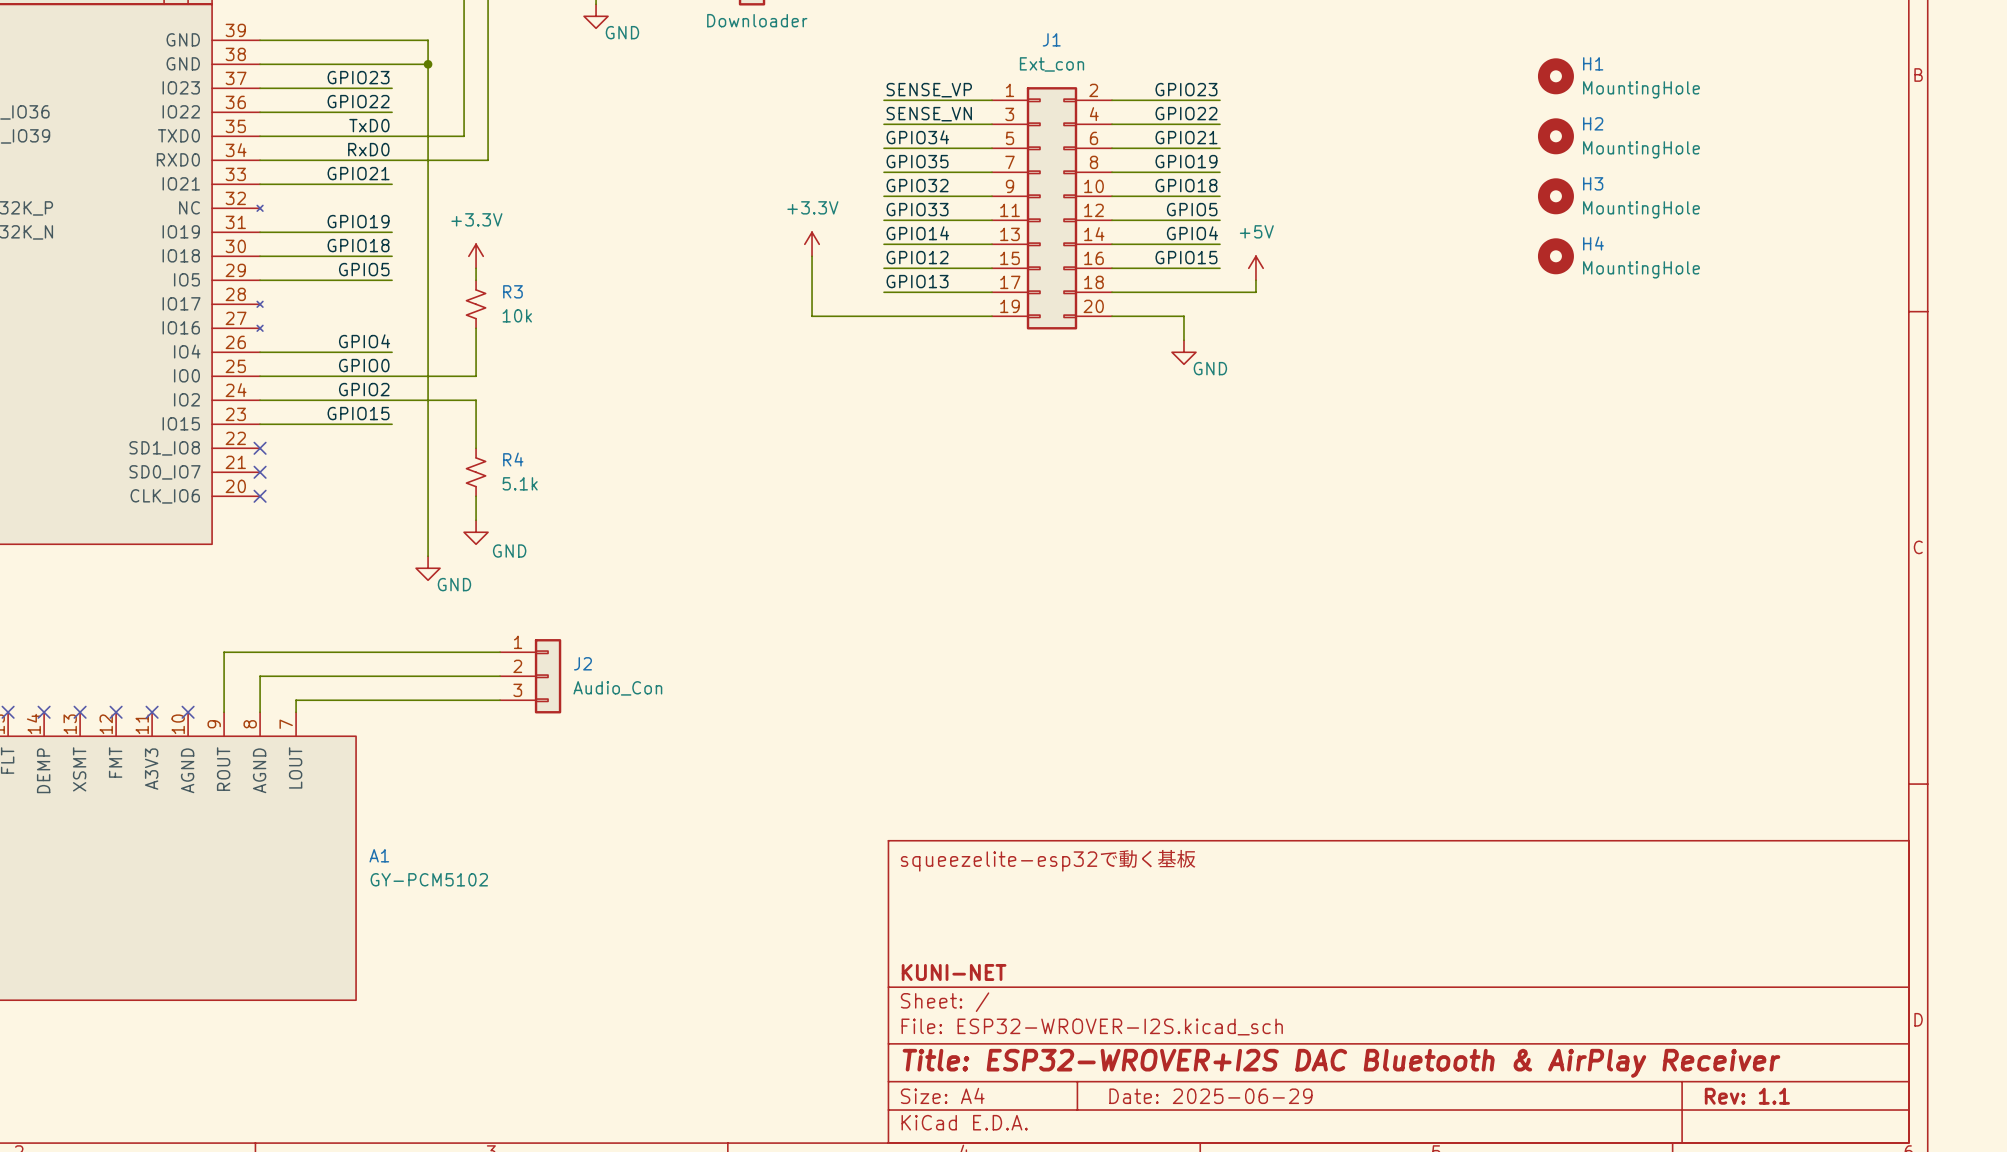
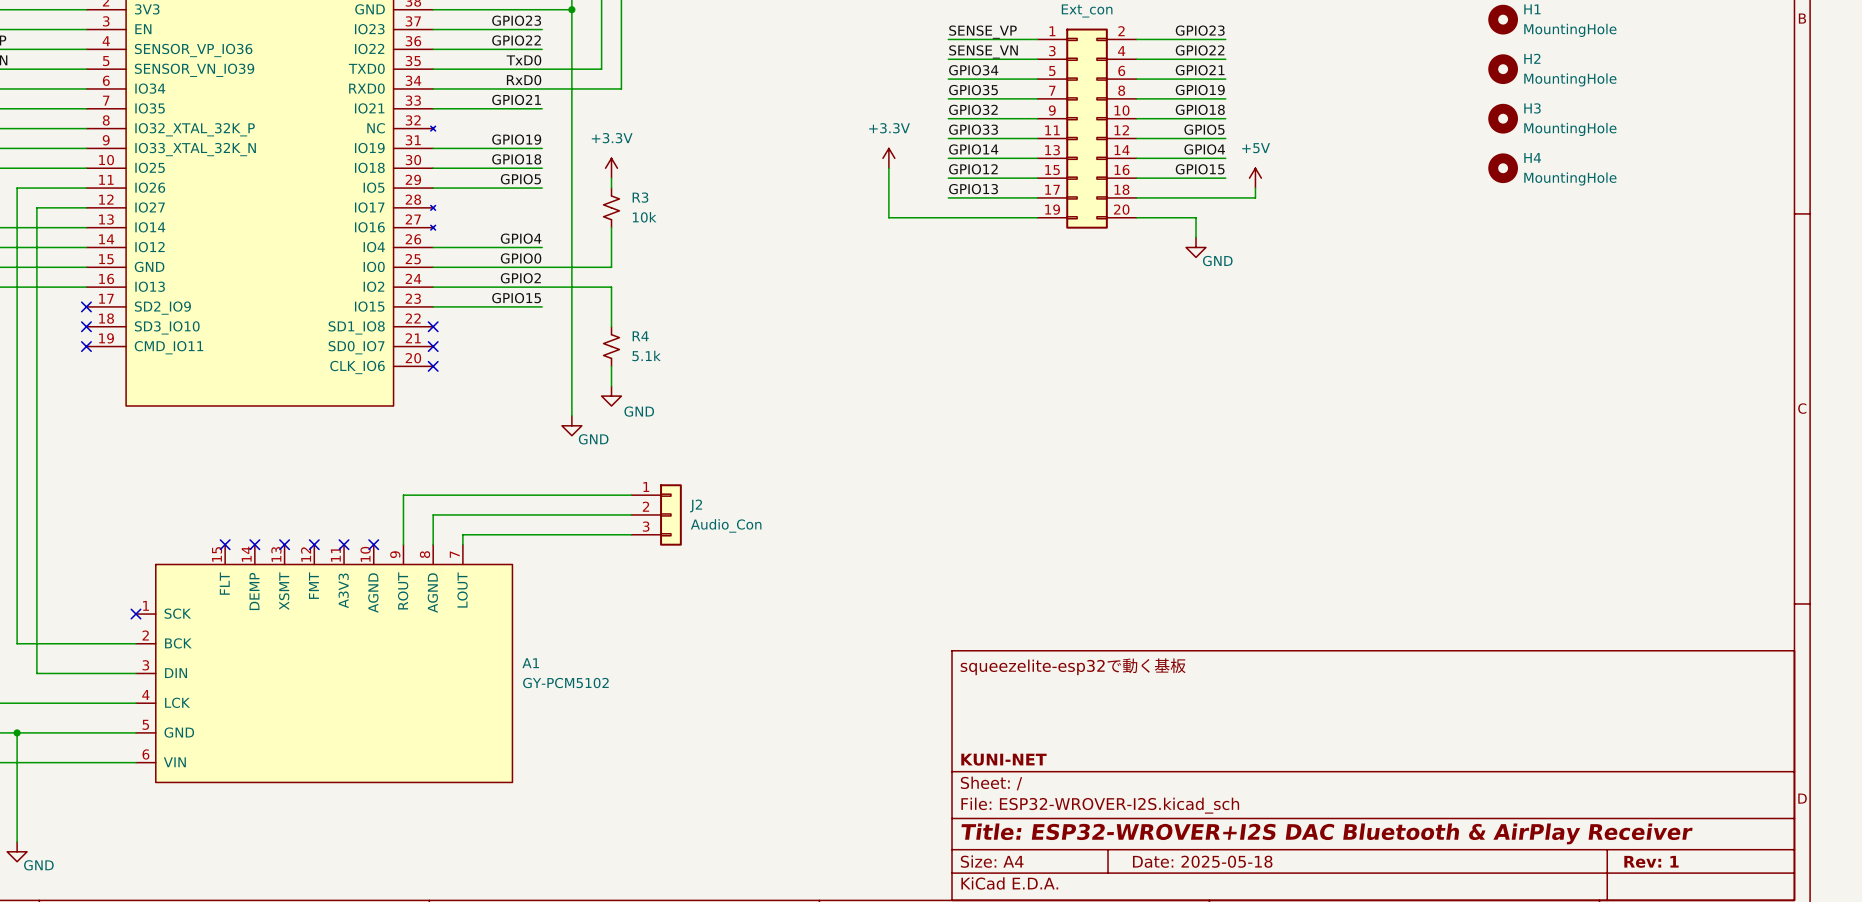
title block: Date: 2025-06-29 (1210, 1096) -> Date: 2025-05-18 (1202, 861)
title block: Rev: 1.1 (1747, 1096) -> Rev: 1 (1651, 861)

